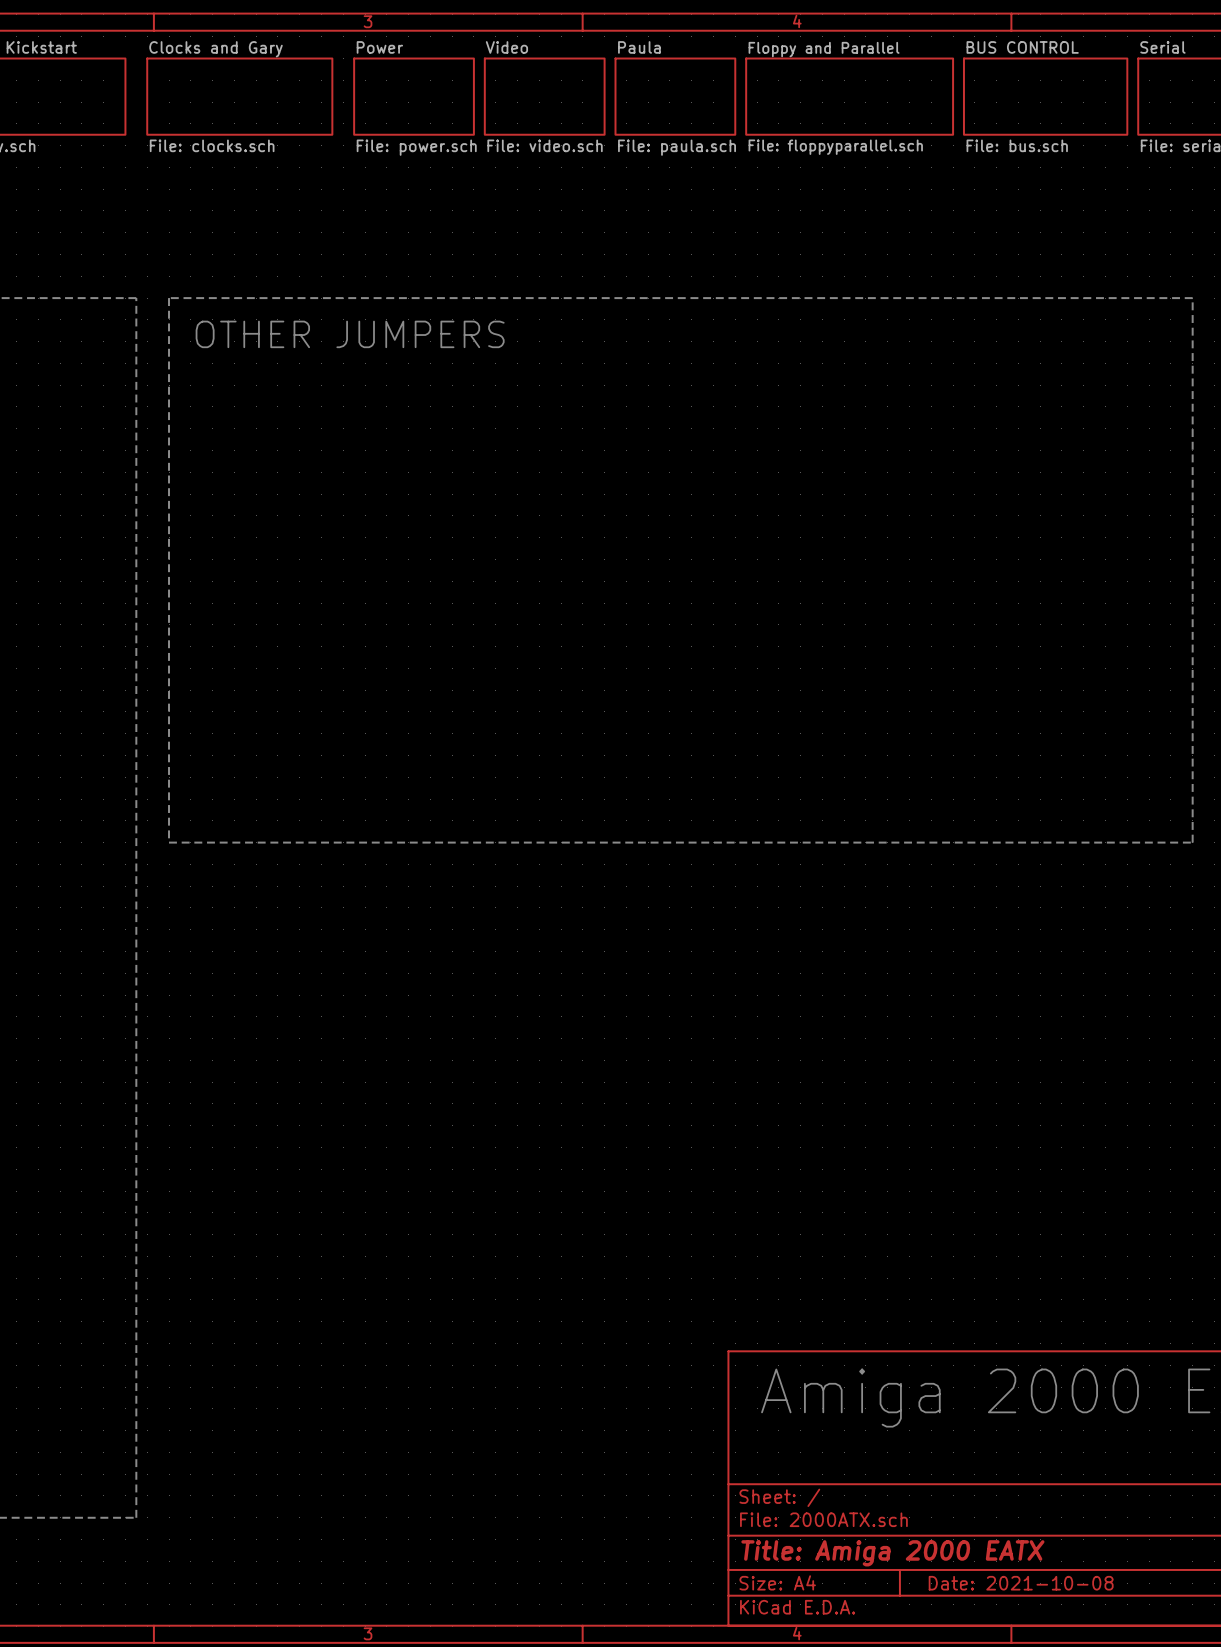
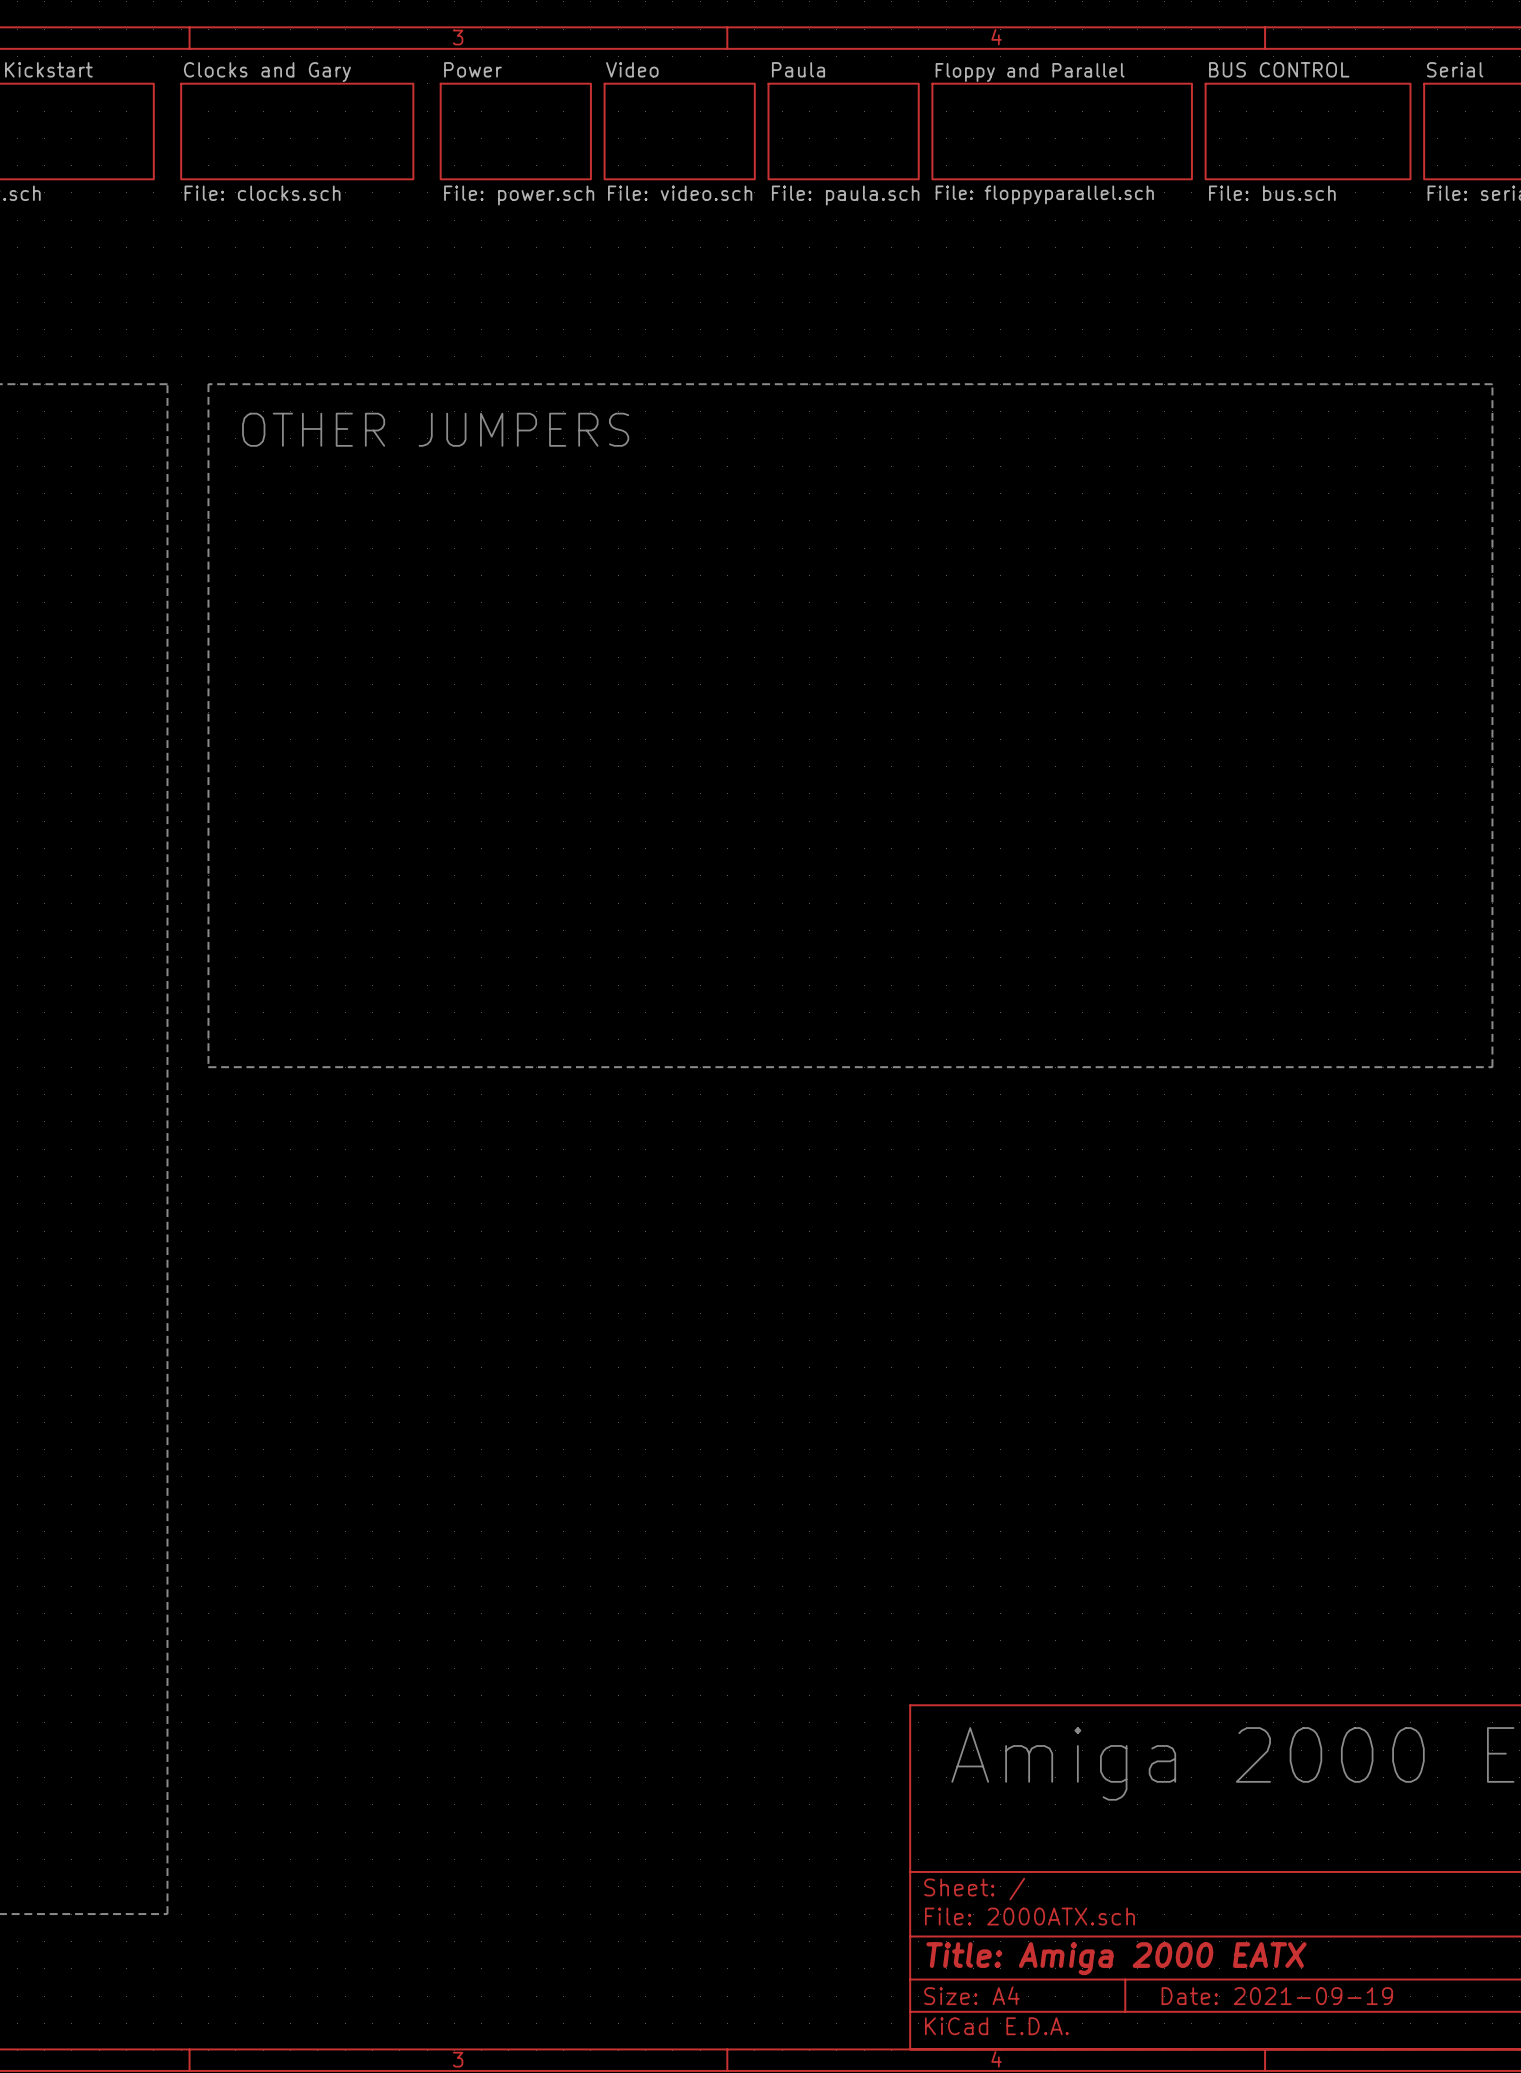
title block: Date: 2021-10-08 (1021, 1583) -> Date: 2021-09-19 (1277, 1996)

